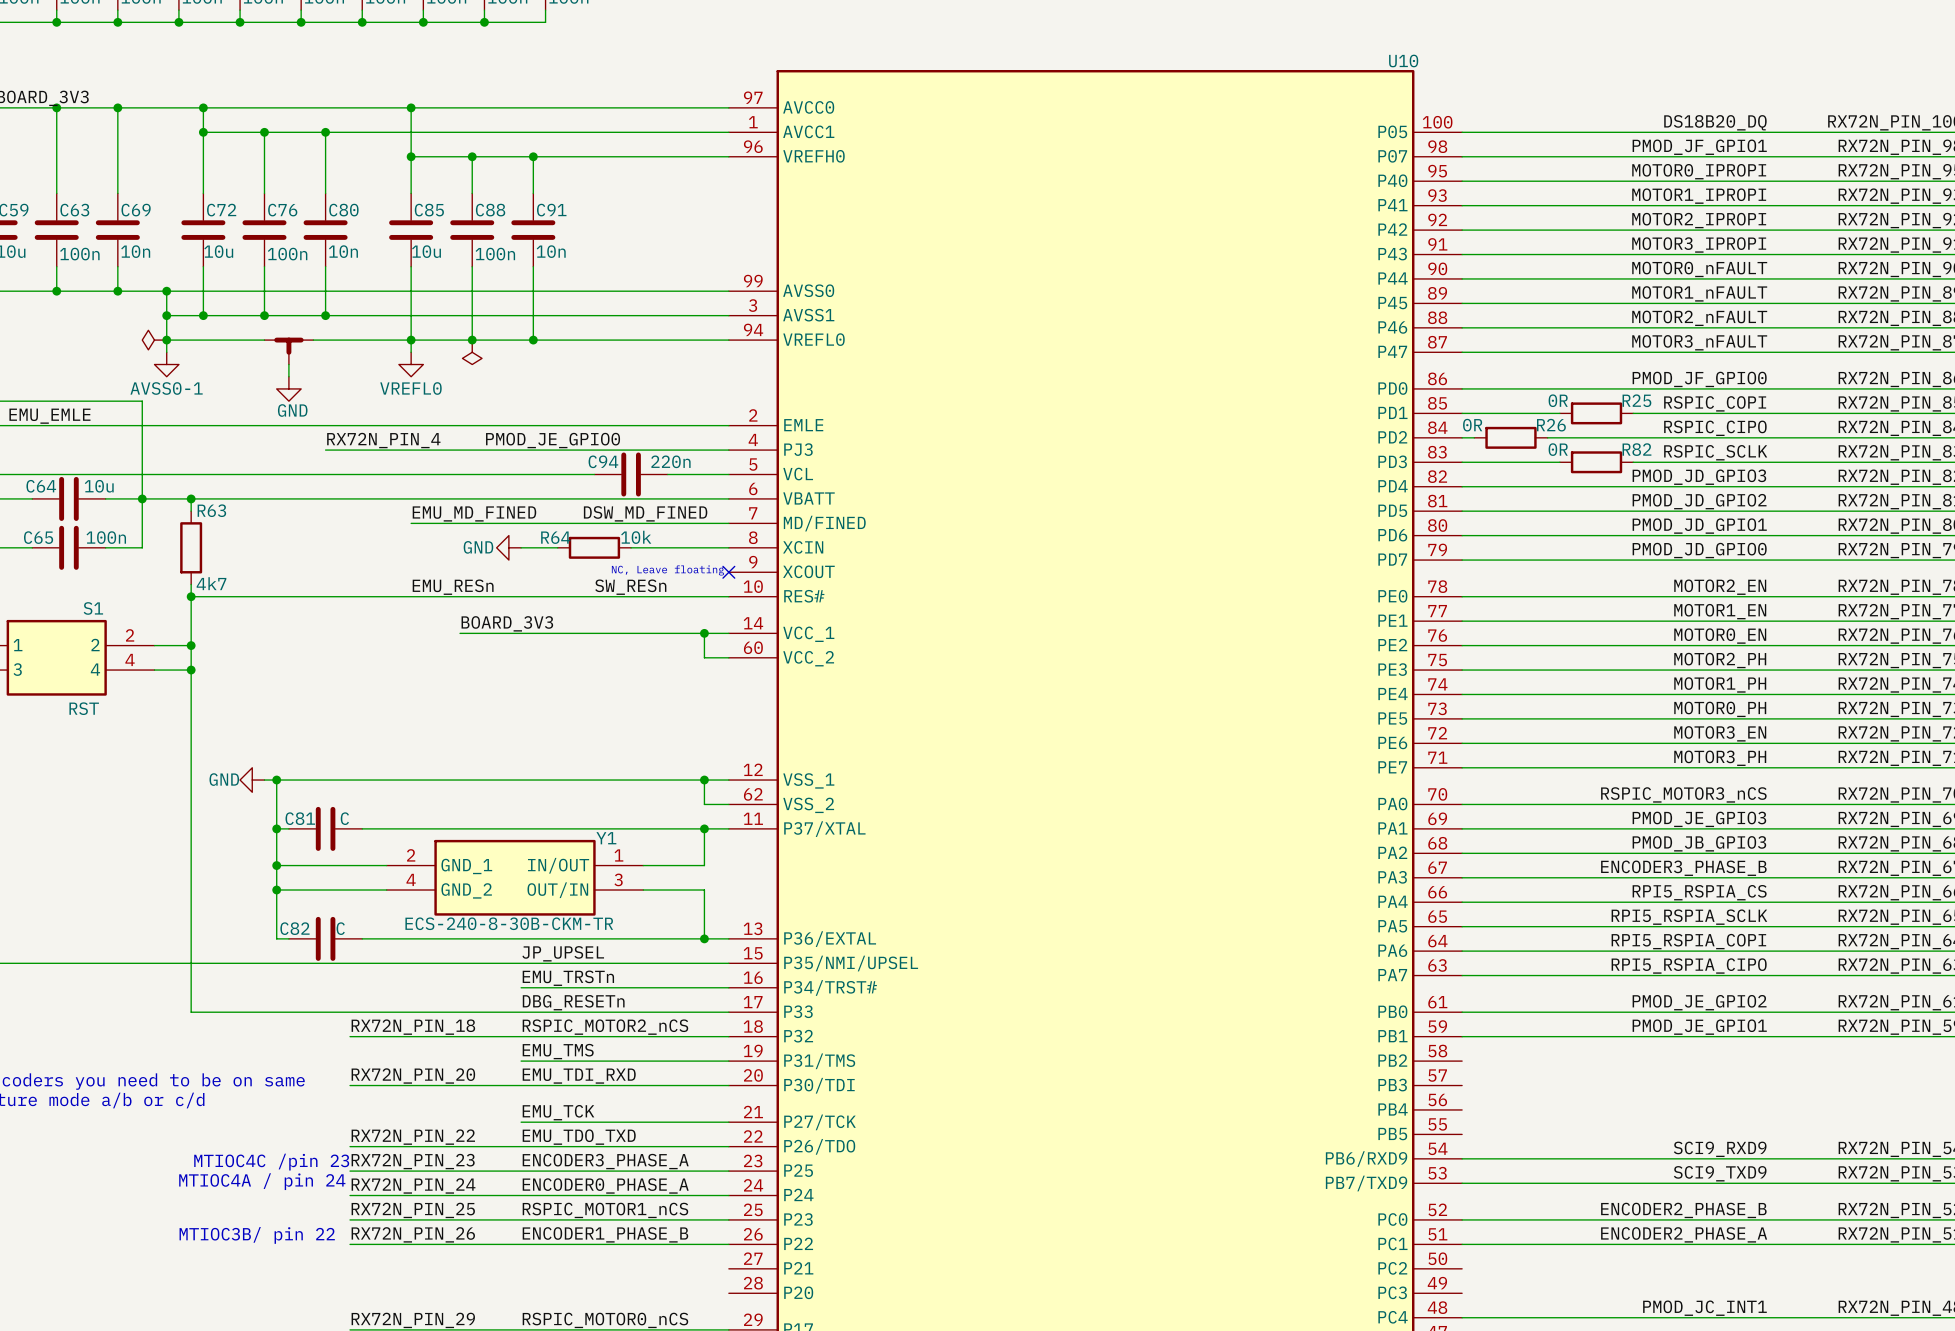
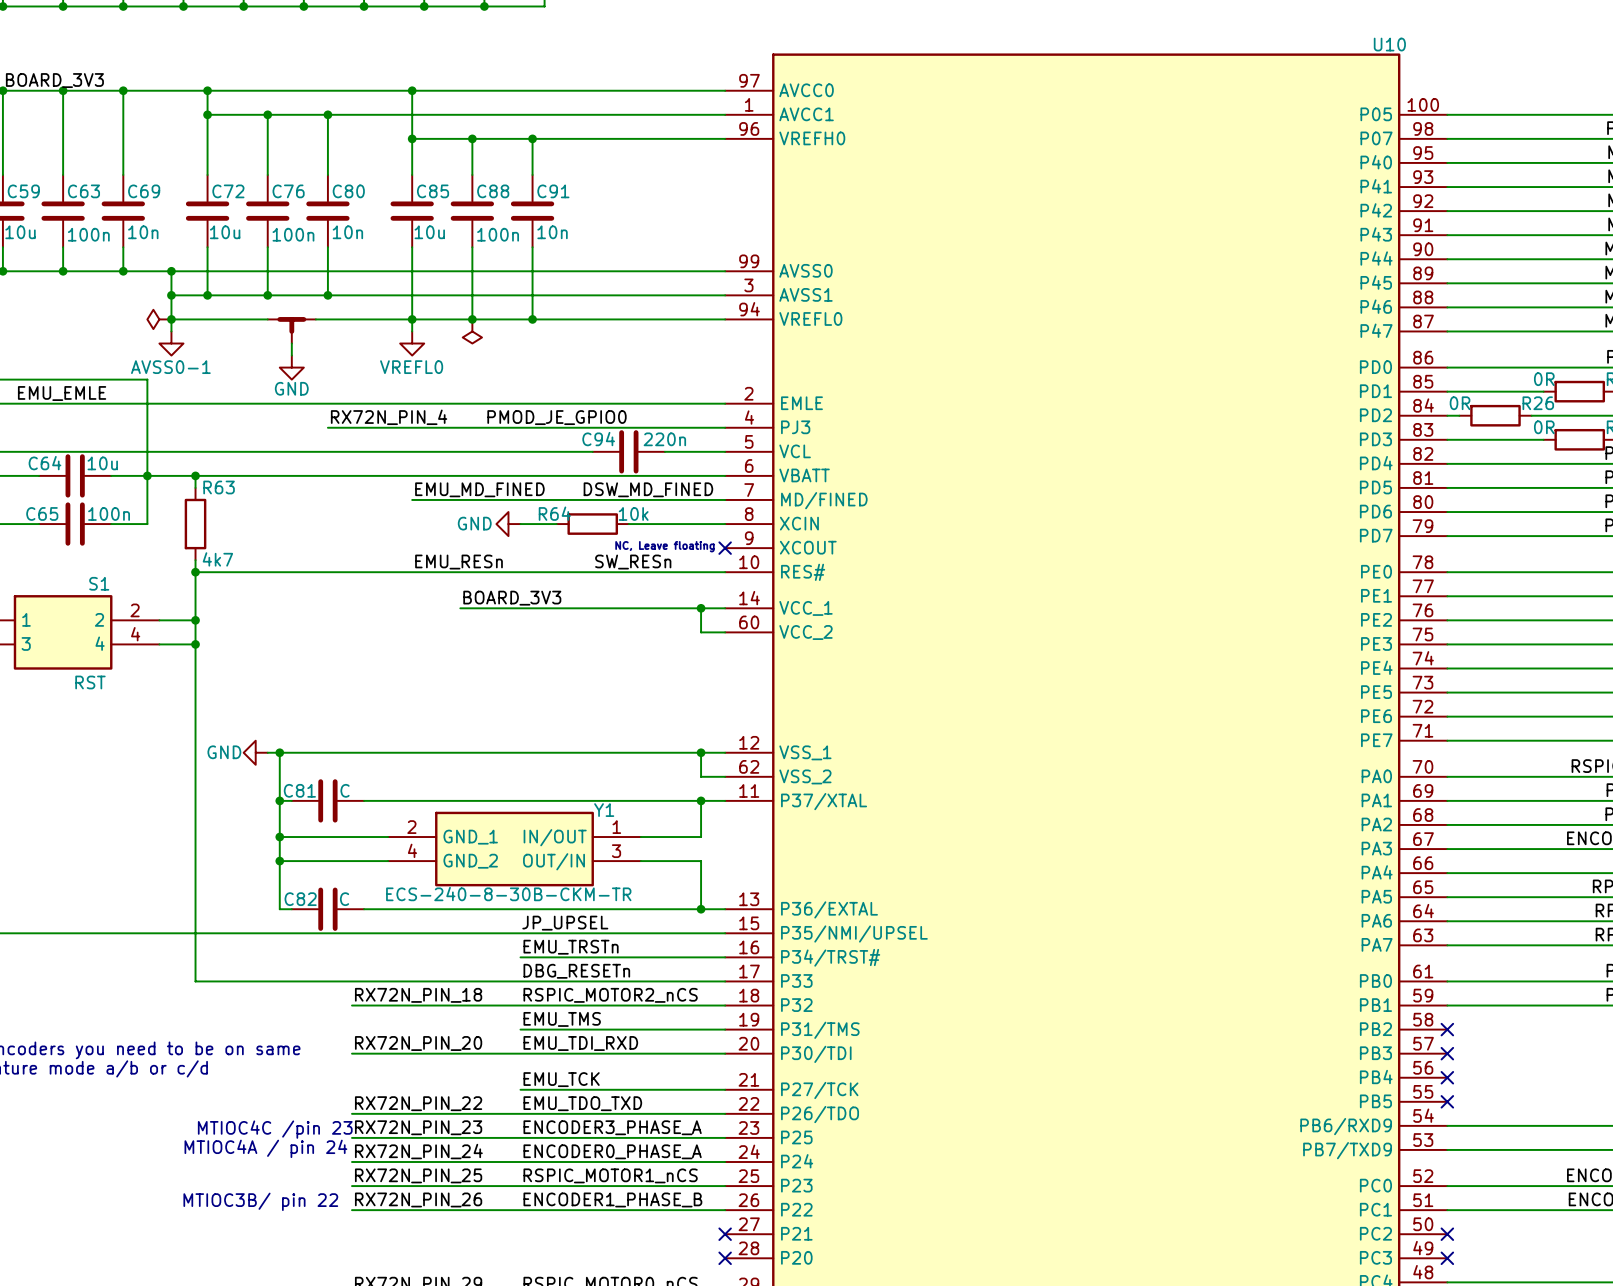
no-connect mark: none -> (1447, 1029)
no-connect mark: none -> (1447, 1053)
no-connect mark: none -> (1447, 1077)
no-connect mark: none -> (1447, 1101)
no-connect mark: none -> (725, 1234)
no-connect mark: none -> (1447, 1234)
no-connect mark: none -> (725, 1258)
no-connect mark: none -> (1447, 1258)

